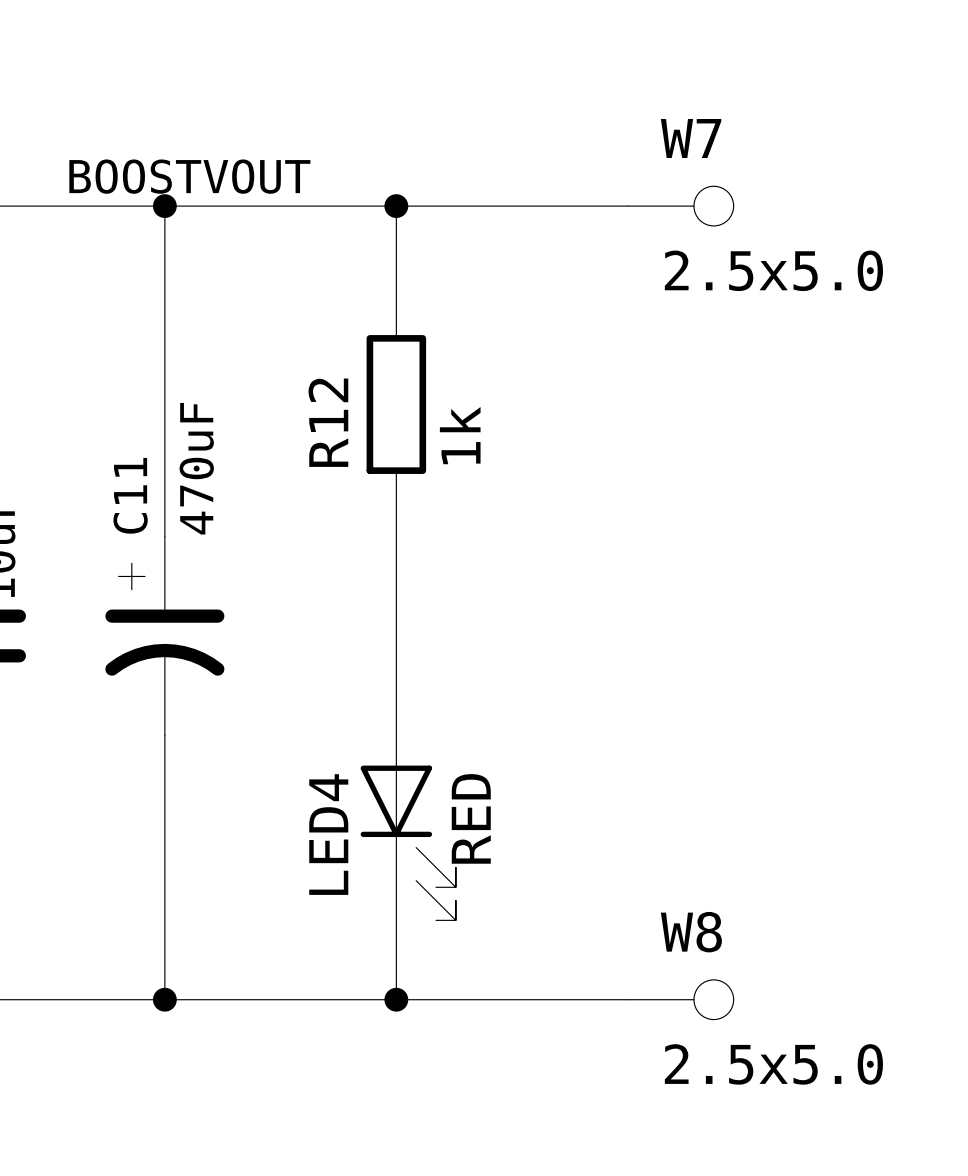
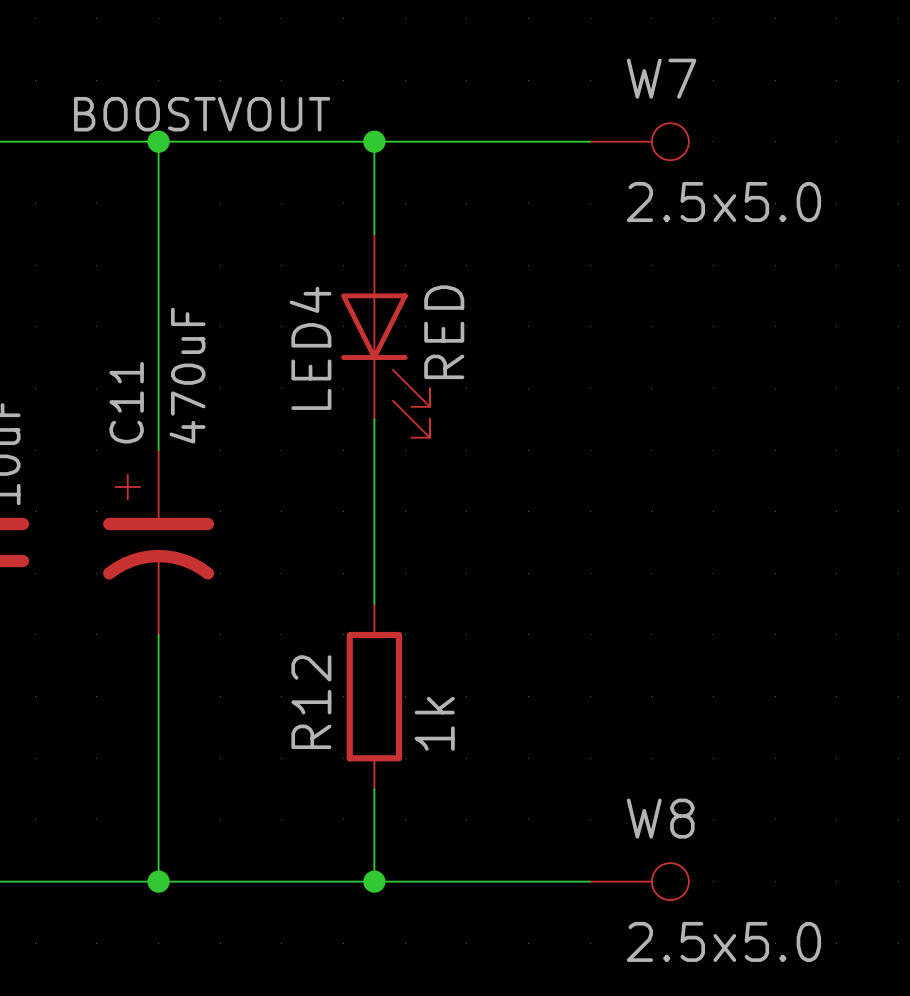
R12 position: (396, 404) -> (374, 696)
LED4 position: (408, 811) -> (385, 335)

